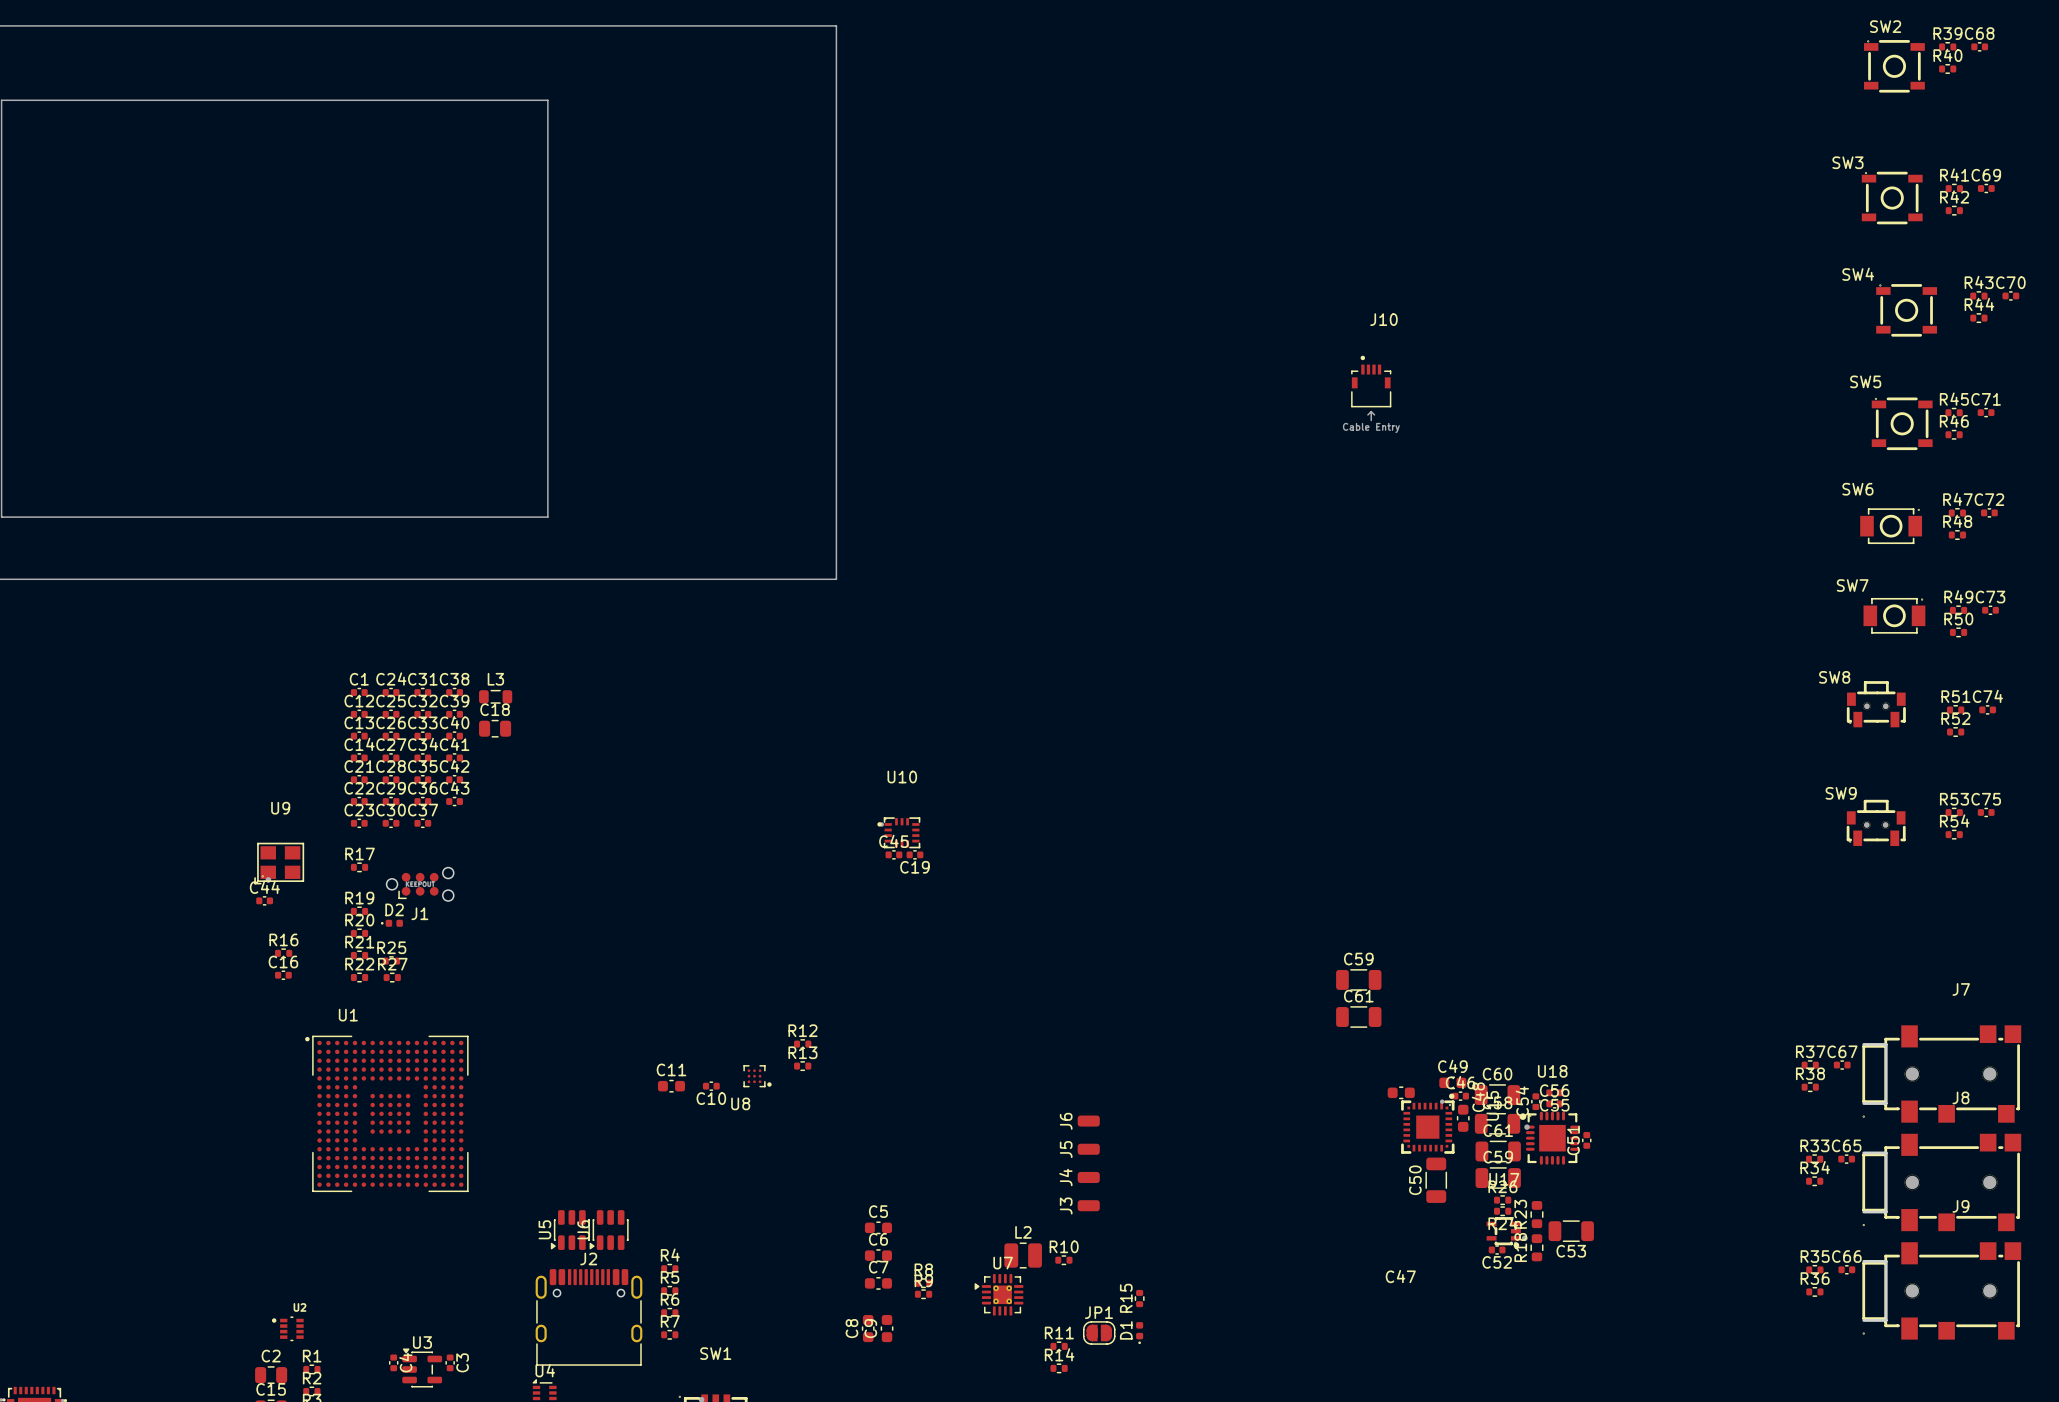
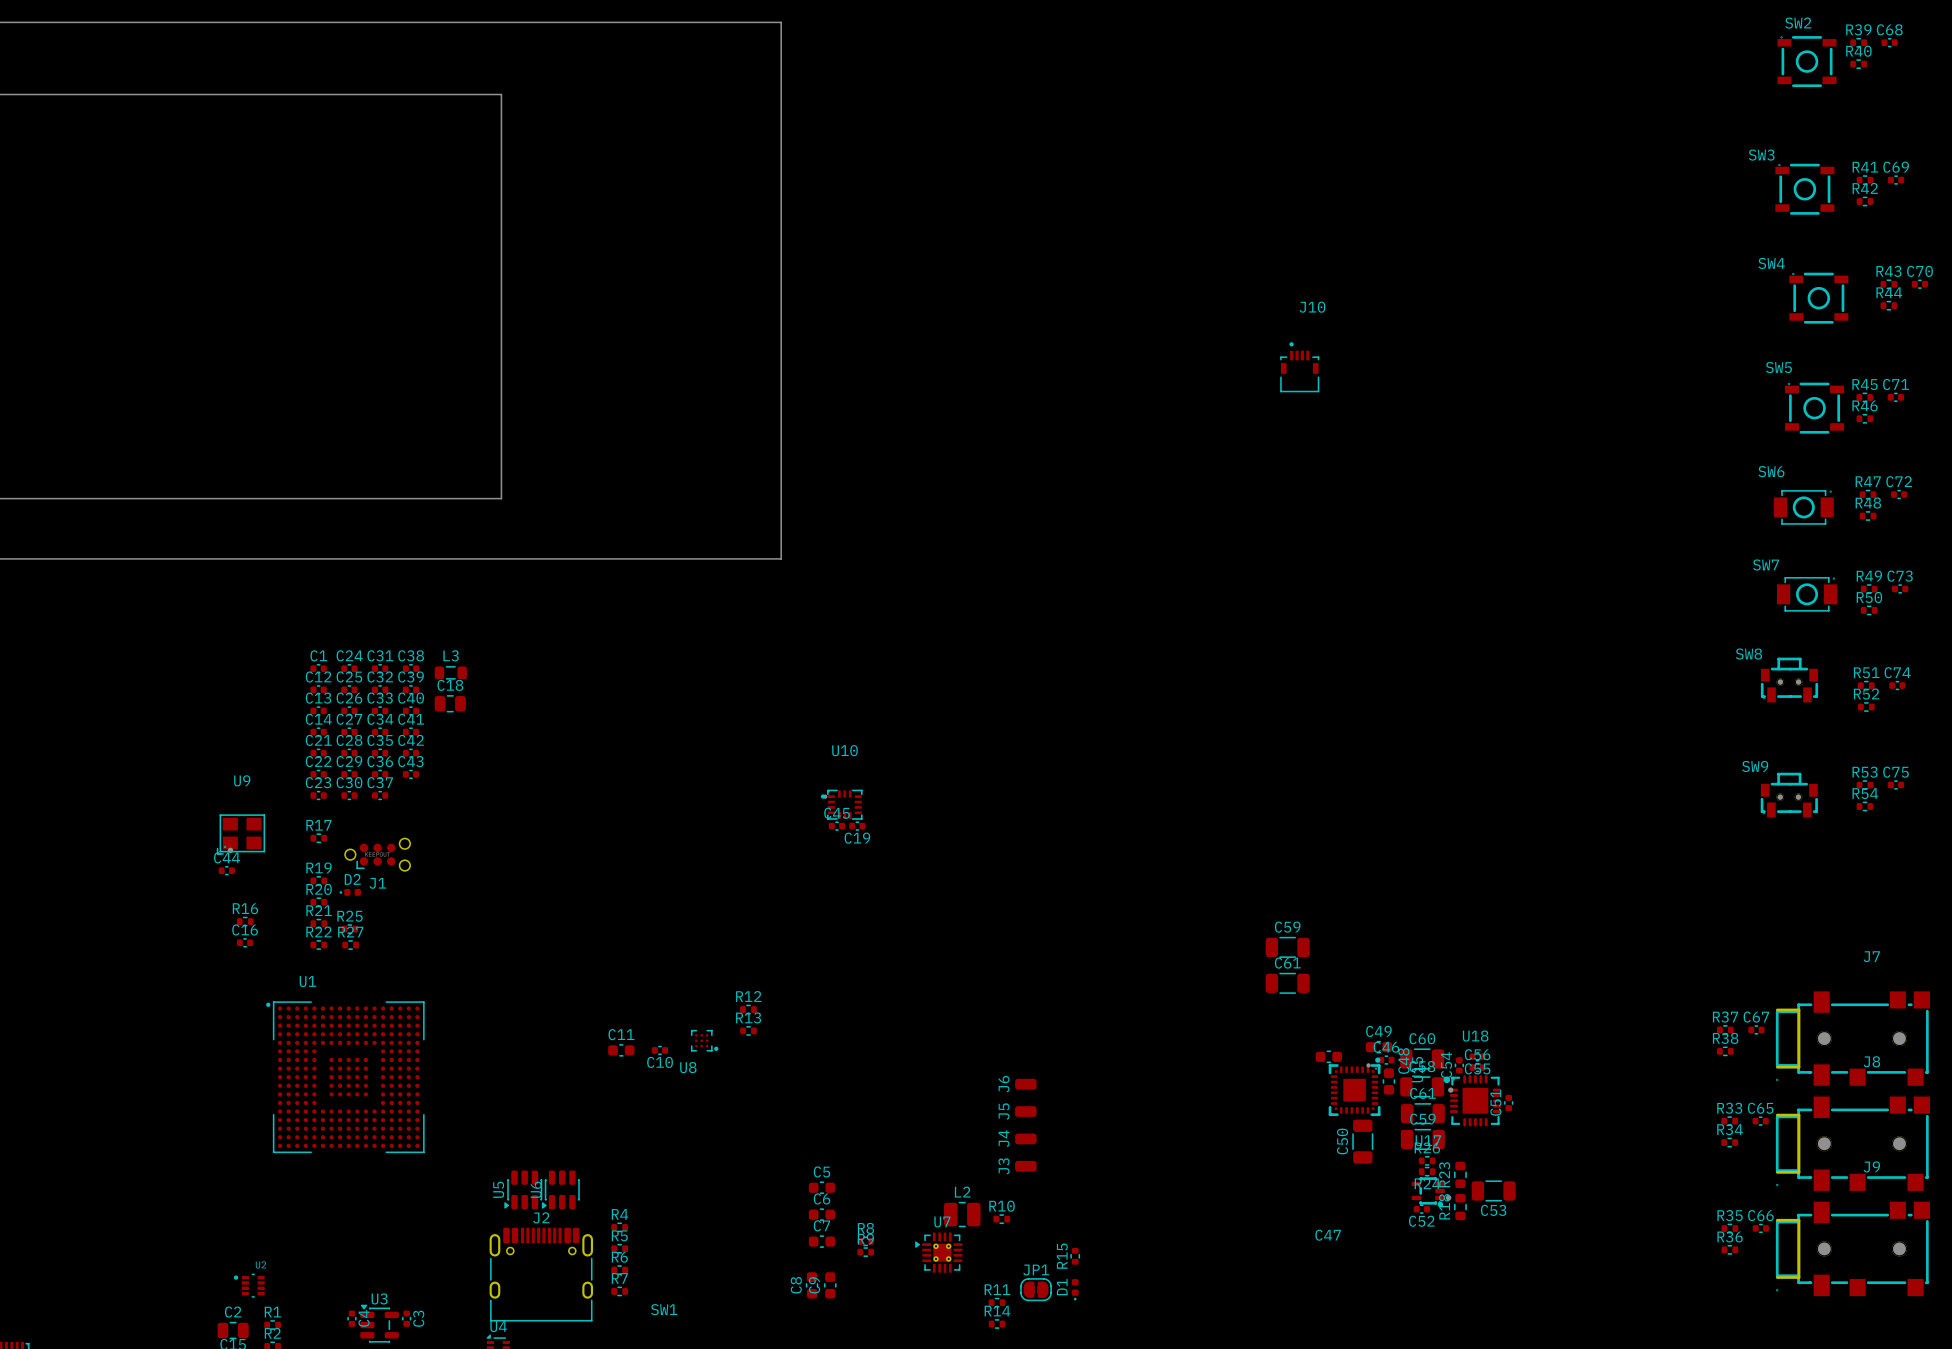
J10 footprint: [1351, 355, 1392, 422] -> [1280, 342, 1320, 393]

